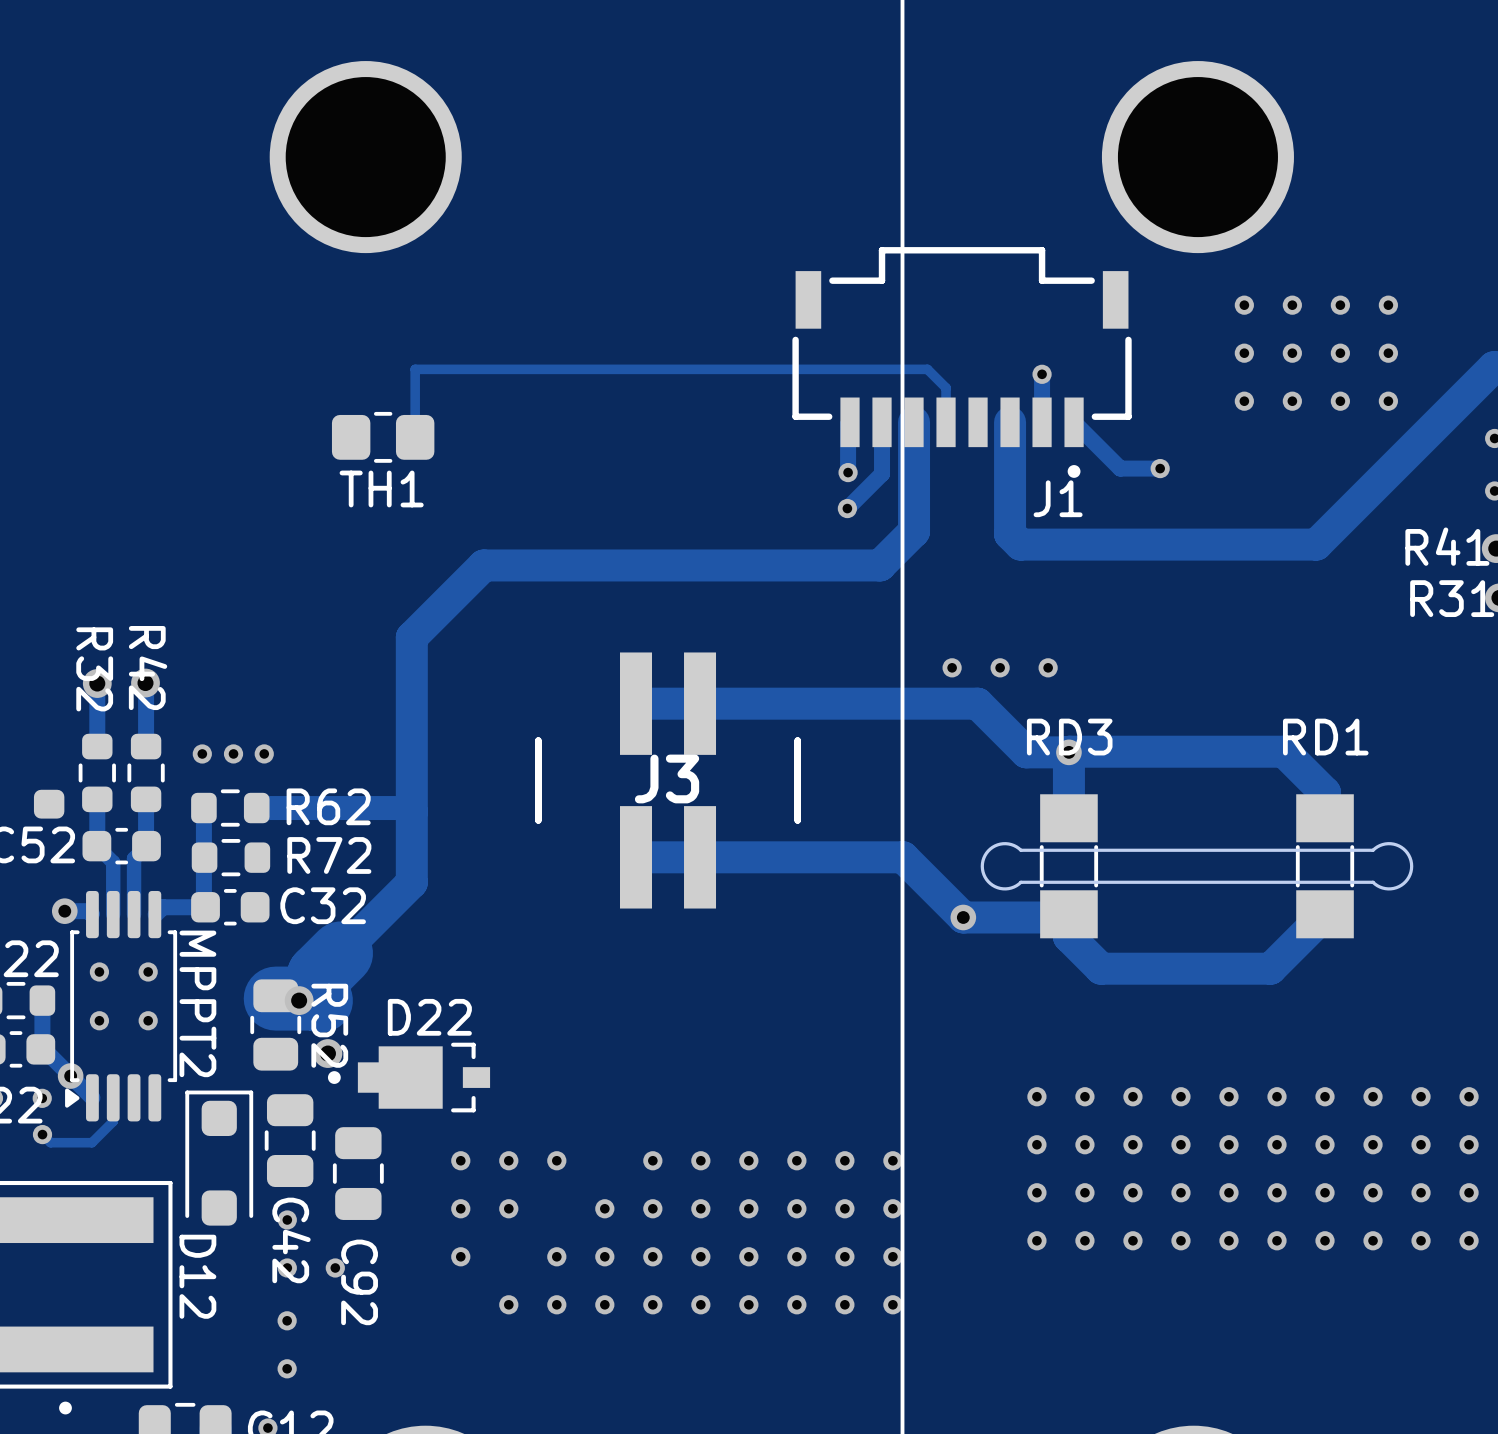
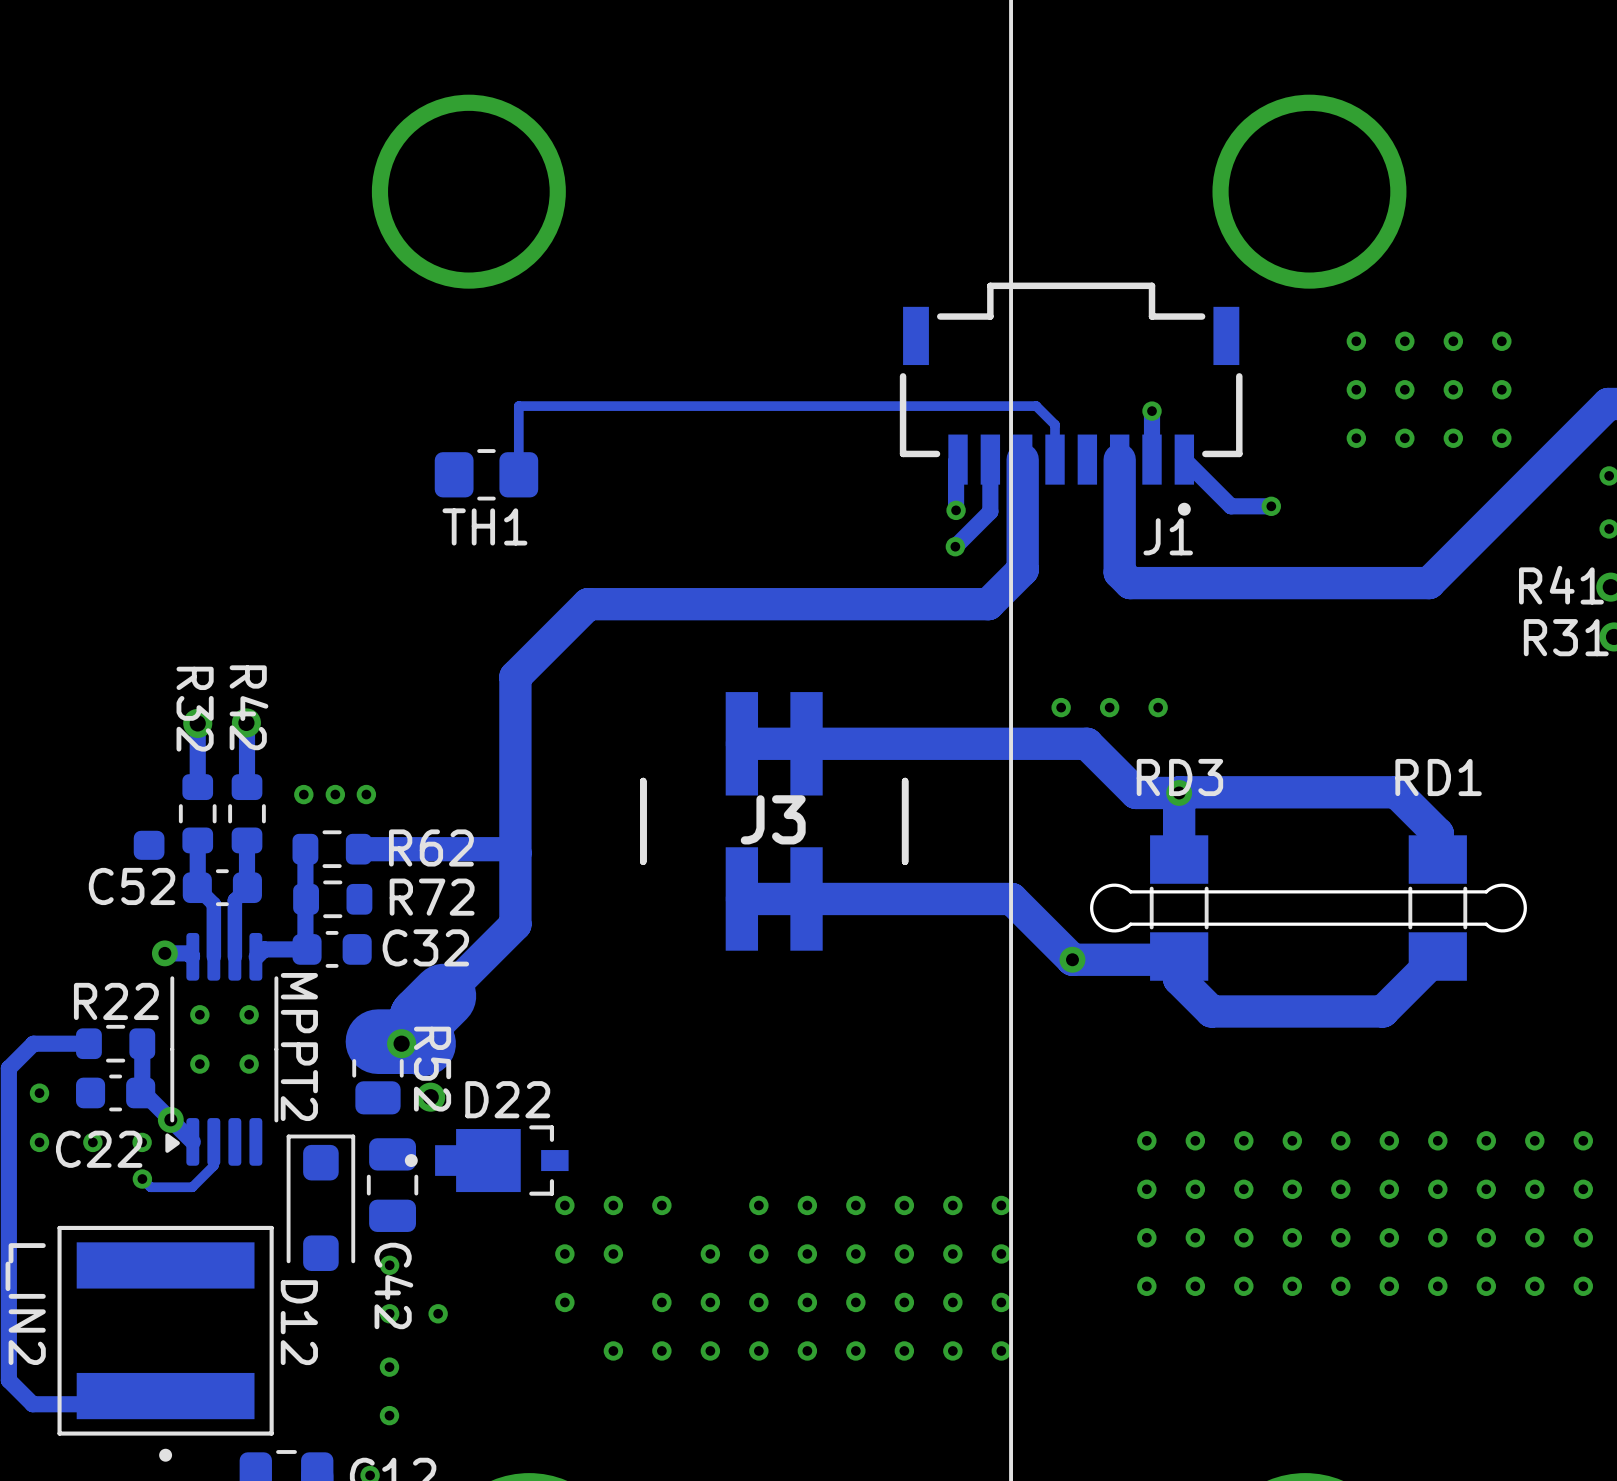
MPPT2 footprint: [65, 890, 178, 1122] -> [165, 932, 279, 1166]
D22 position: (409, 1077) -> (486, 1160)
C92: (358, 1173) -> none

